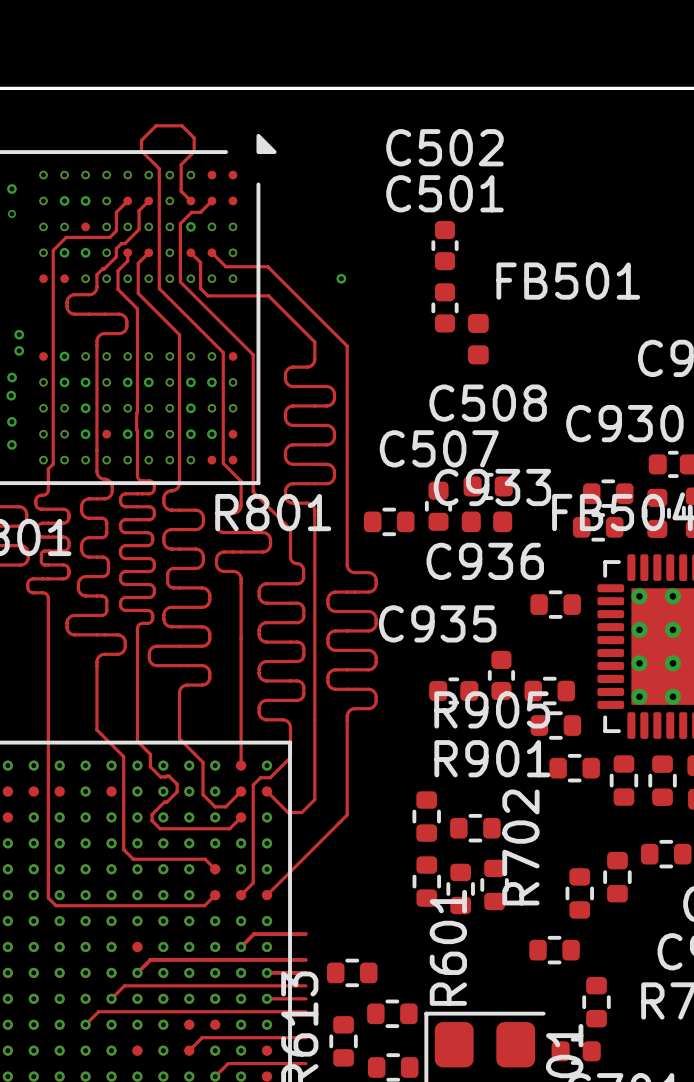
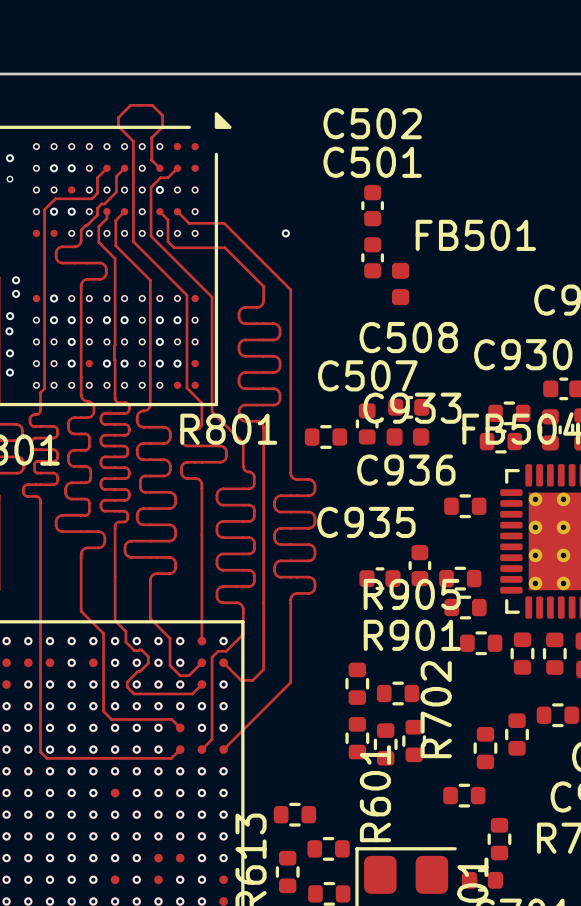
track: (305, 934) (254, 934) (241, 947) -> none
track: (305, 959) (150, 959) (137, 972) -> none
track: (267, 972) (305, 972) -> none
track: (305, 985) (124, 985) (111, 998) -> none
track: (267, 998) (305, 998) -> none
track: (305, 1011) (98, 1011) (85, 1024) -> none
track: (305, 1037) (202, 1037) (189, 1050) -> none
track: (305, 1063) (228, 1063) (215, 1076) -> none

